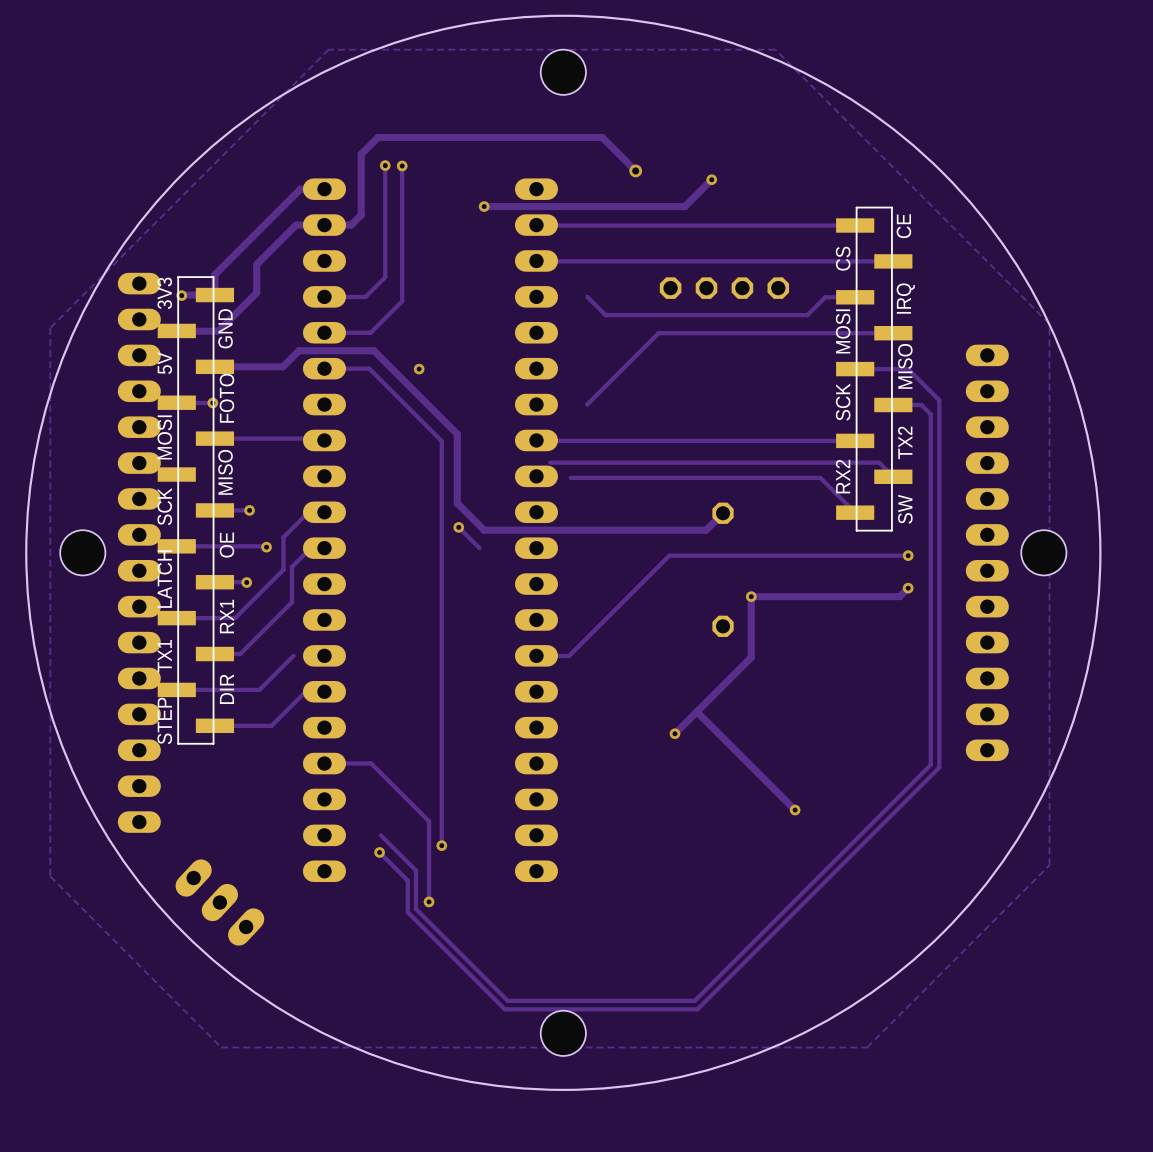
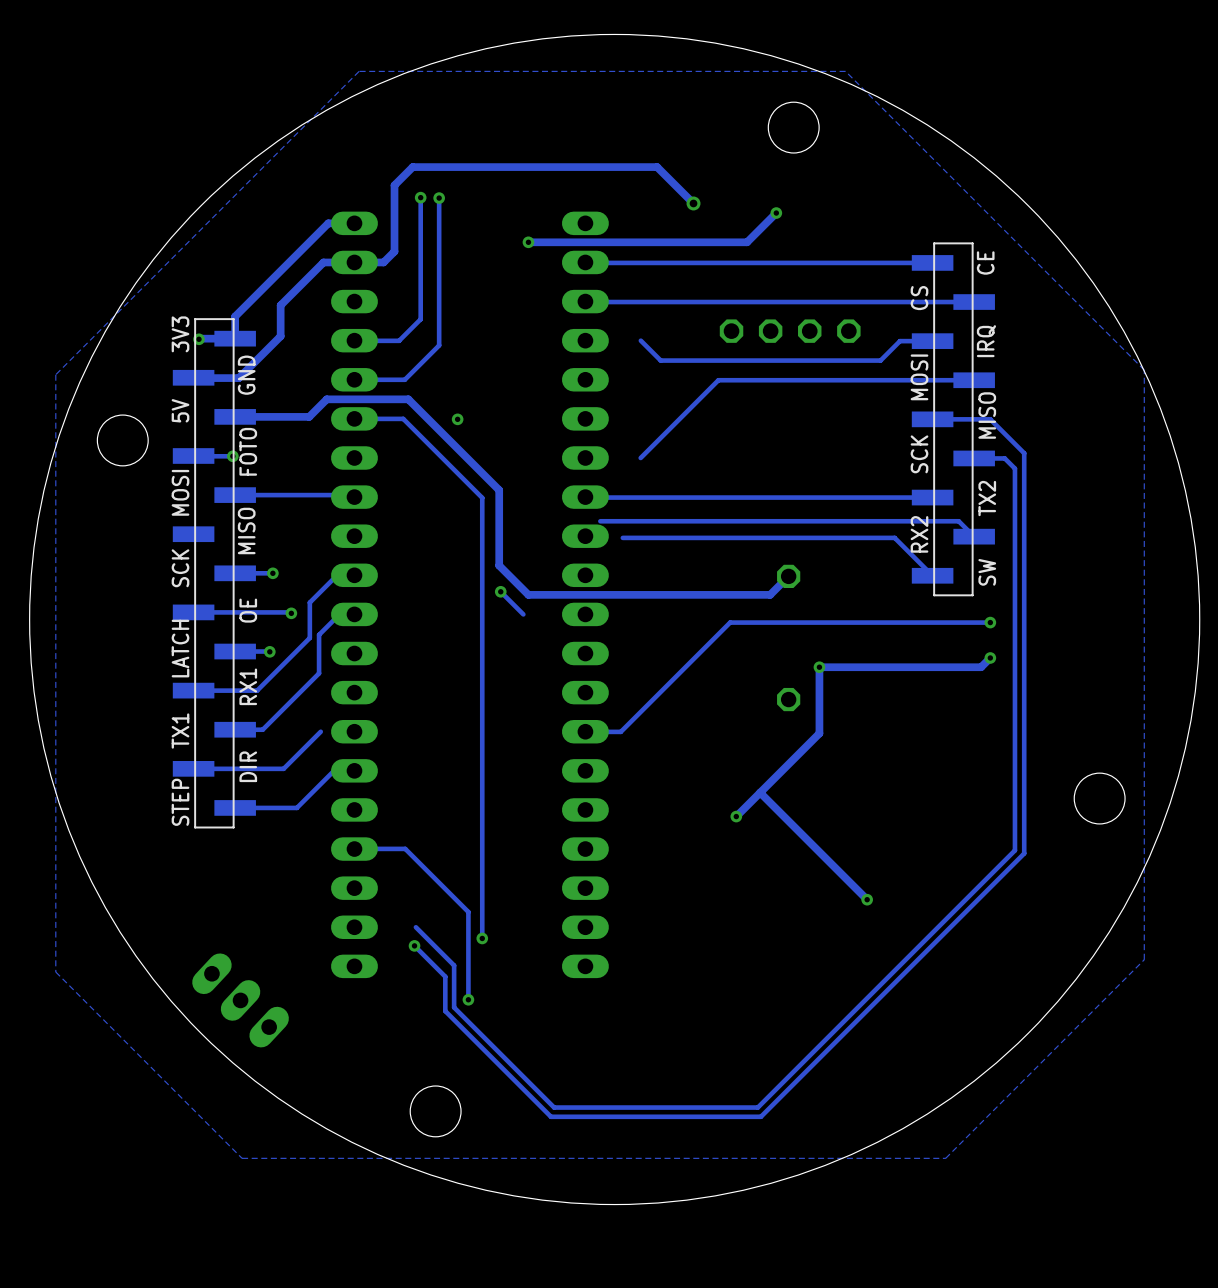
round board edge: [25, 14, 1102, 1091] -> none
drawing: none -> [29, 34, 1200, 1205]
hole: (563, 72) -> none
hole: (82, 552) -> none
part: (139, 552) -> none
part: (987, 552) -> none
hole: (1043, 552) -> none
hole: (563, 1033) -> none

